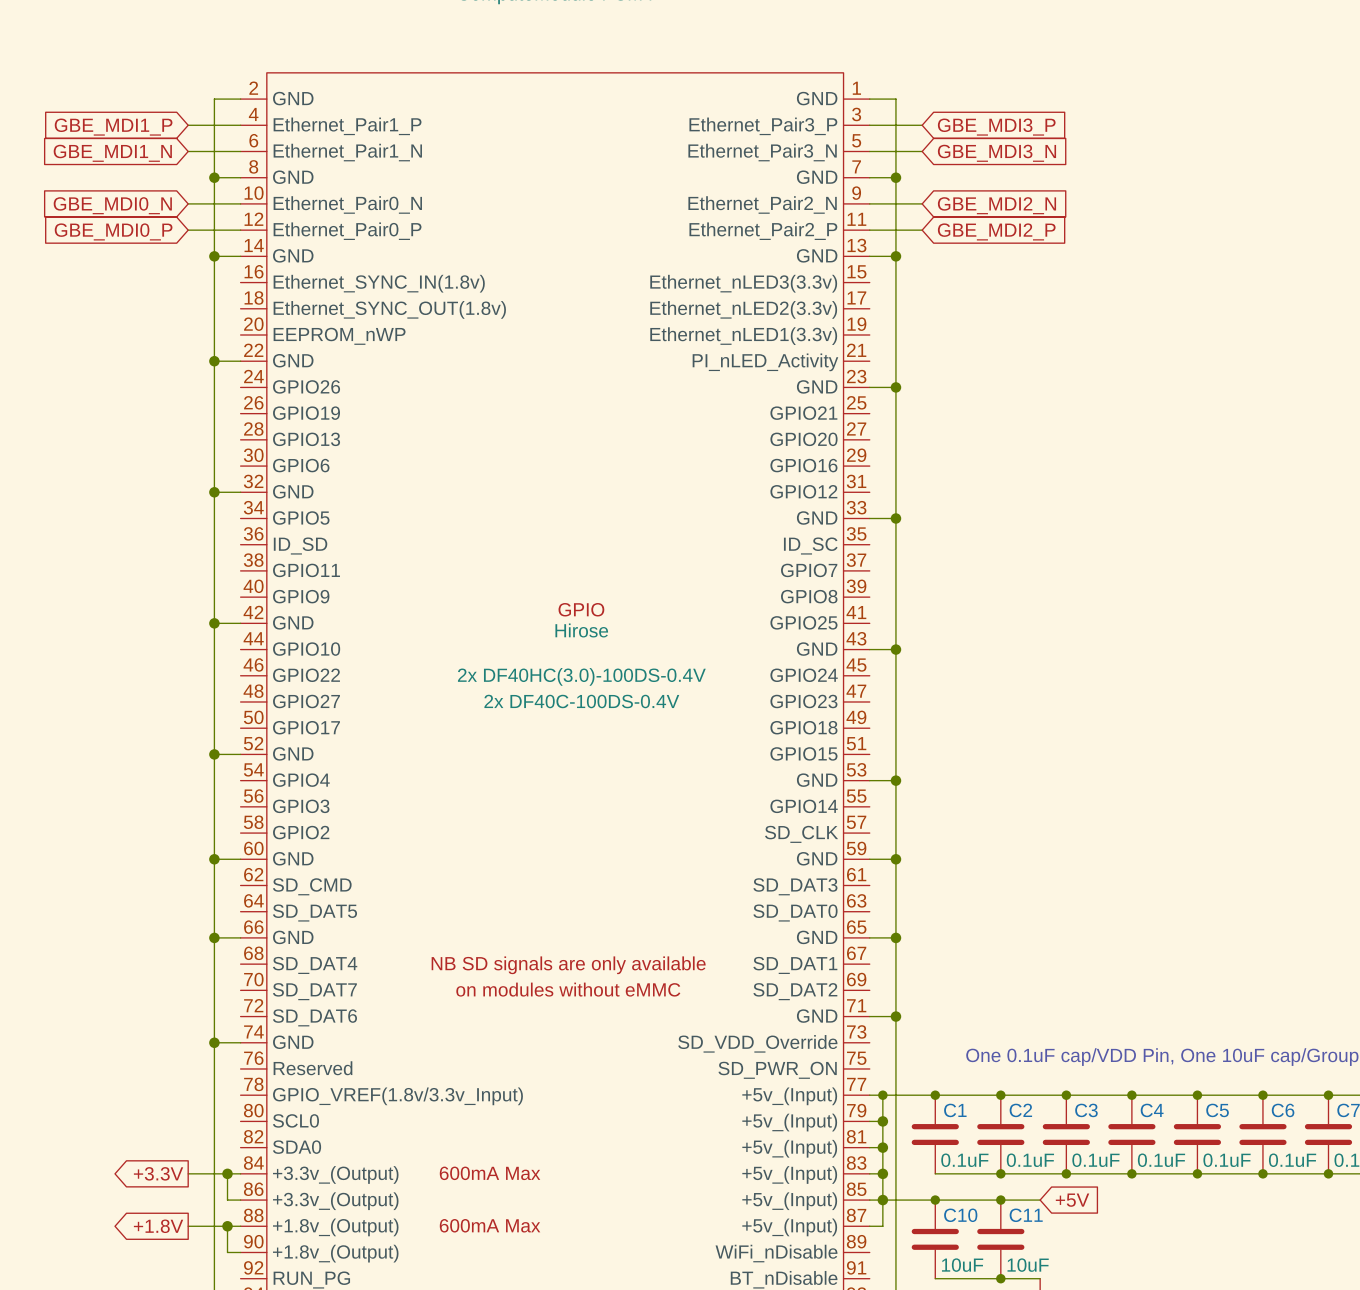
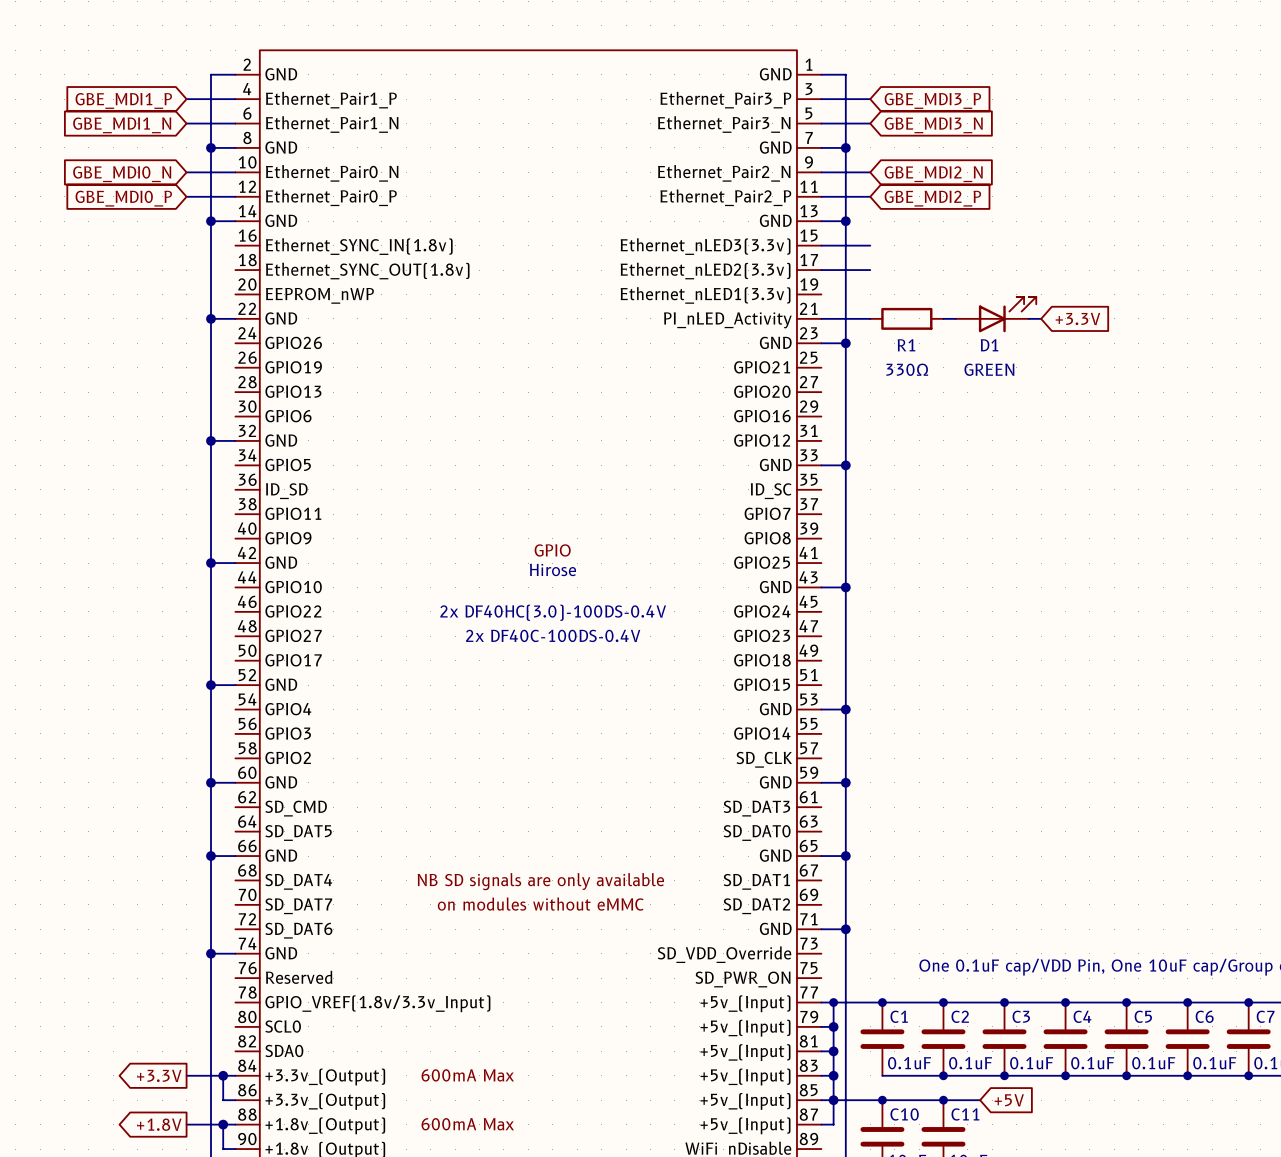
wire: none -> (821, 245) (870, 245)
wire: none -> (821, 270) (870, 270)
D1: none -> GREEN (995, 314)
wire: none -> (821, 318) (870, 318)
R1: none -> 330Ω (906, 318)
wire: none -> (943, 318) (955, 318)
wire: none -> (1028, 318) (1041, 318)
global label: none -> +3.3V (1077, 318)

